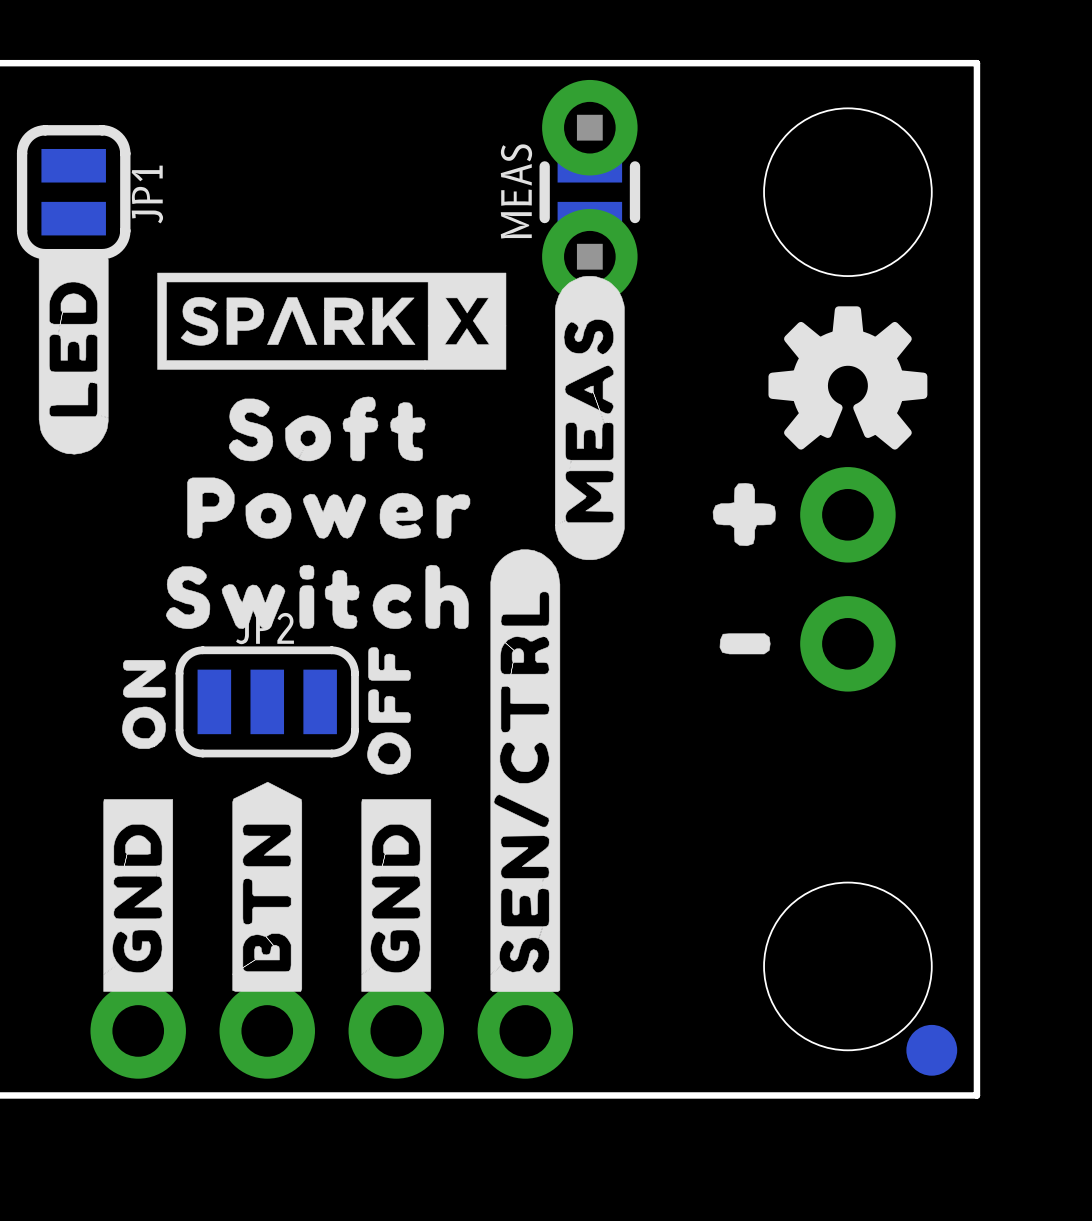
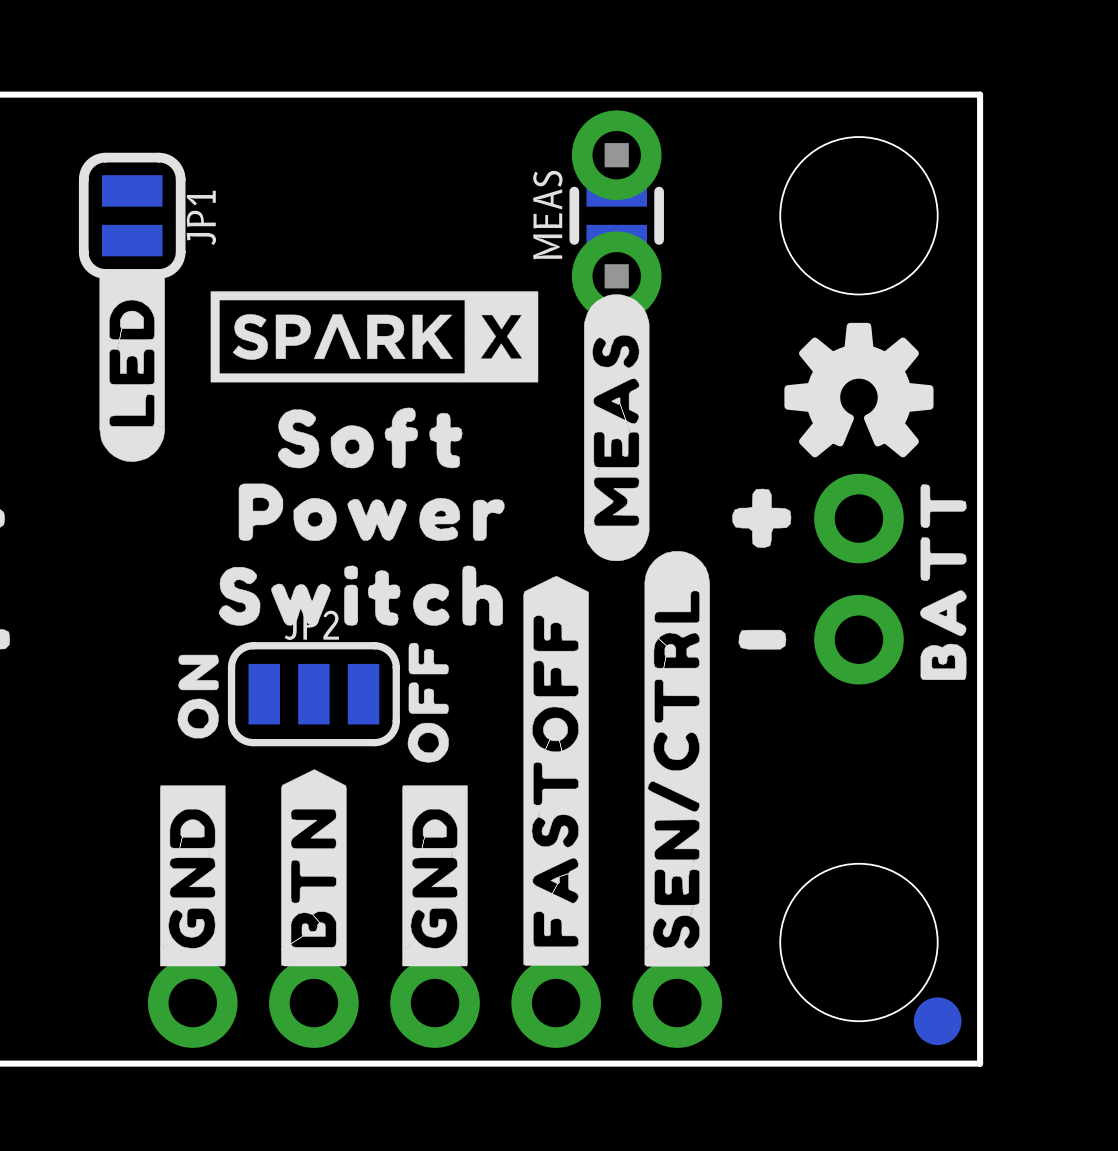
drawing: none -> [920, 484, 967, 680]
drawing: none -> [523, 576, 589, 966]
drawing position: (525, 770) -> (677, 758)
part: (460, 1030) -> none
part: none -> (556, 1003)

